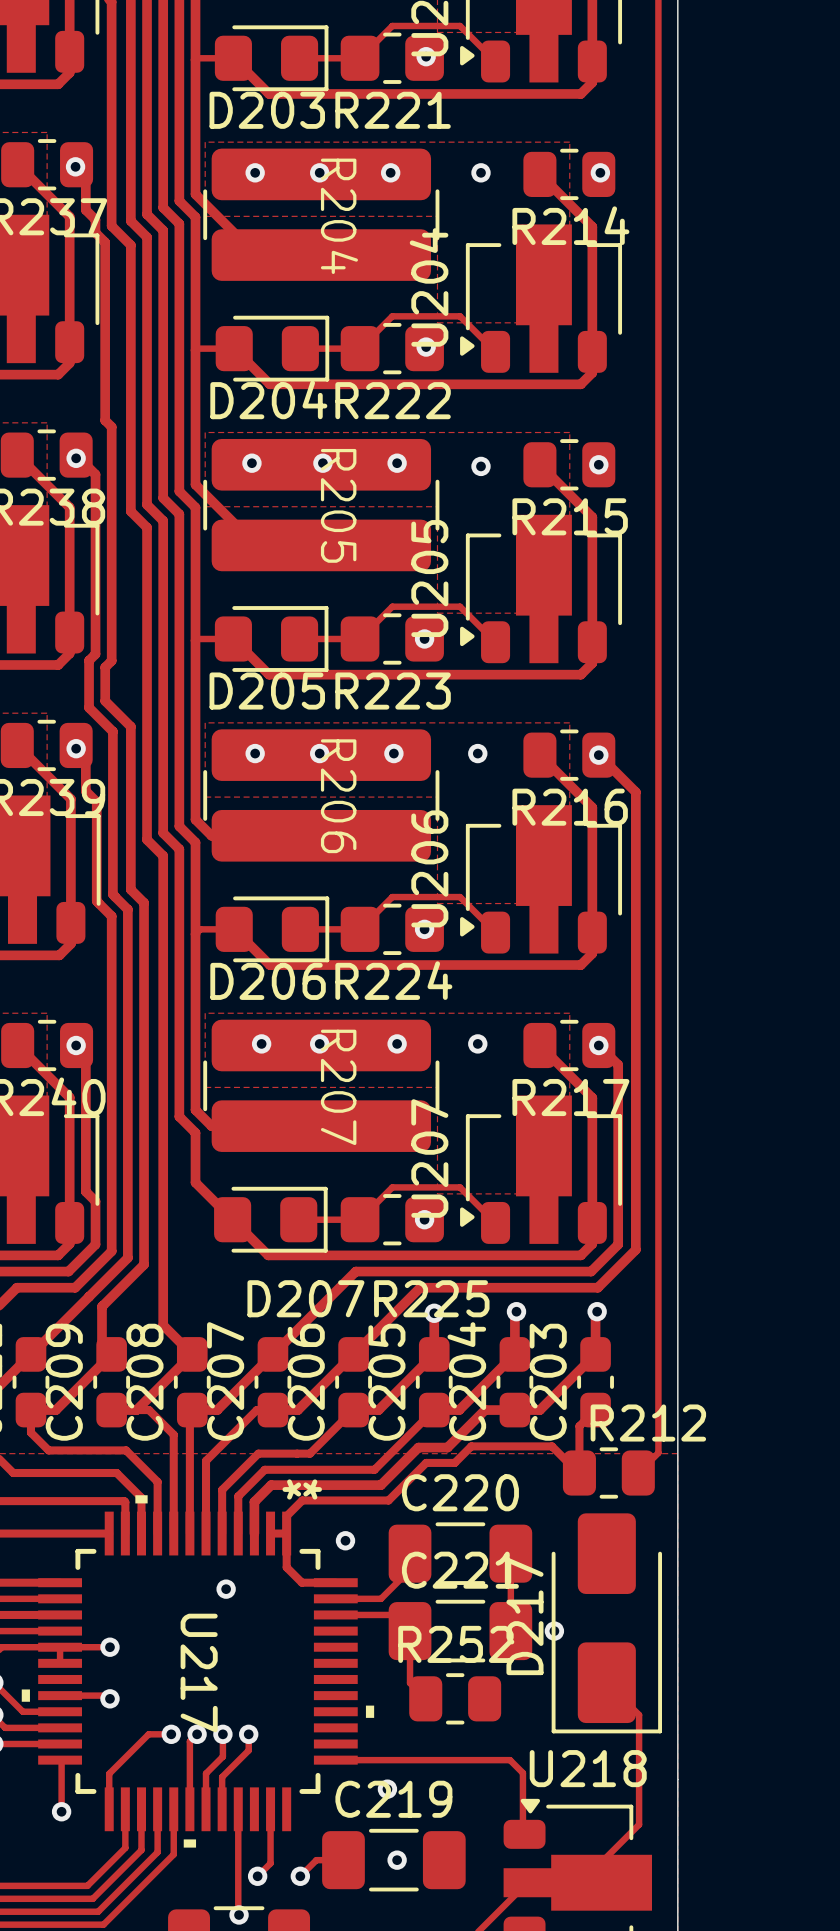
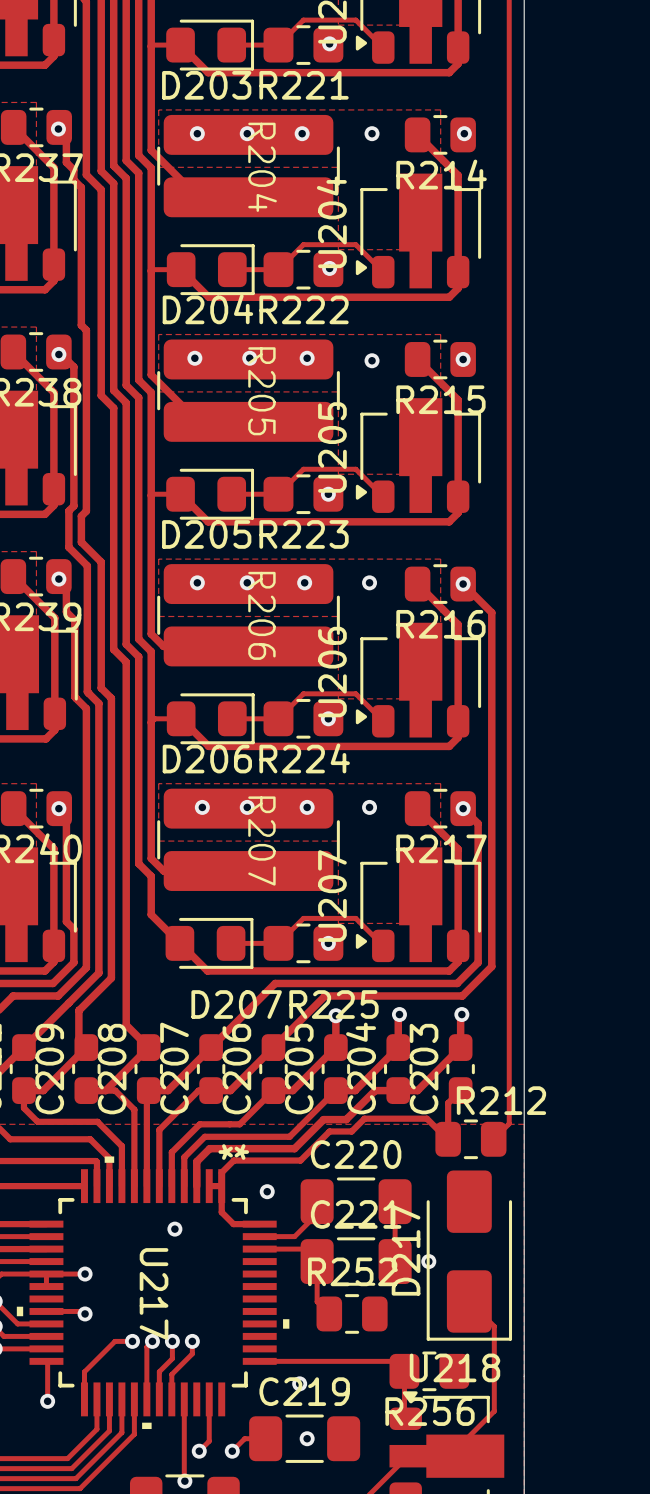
R256: none -> (429, 1371)

